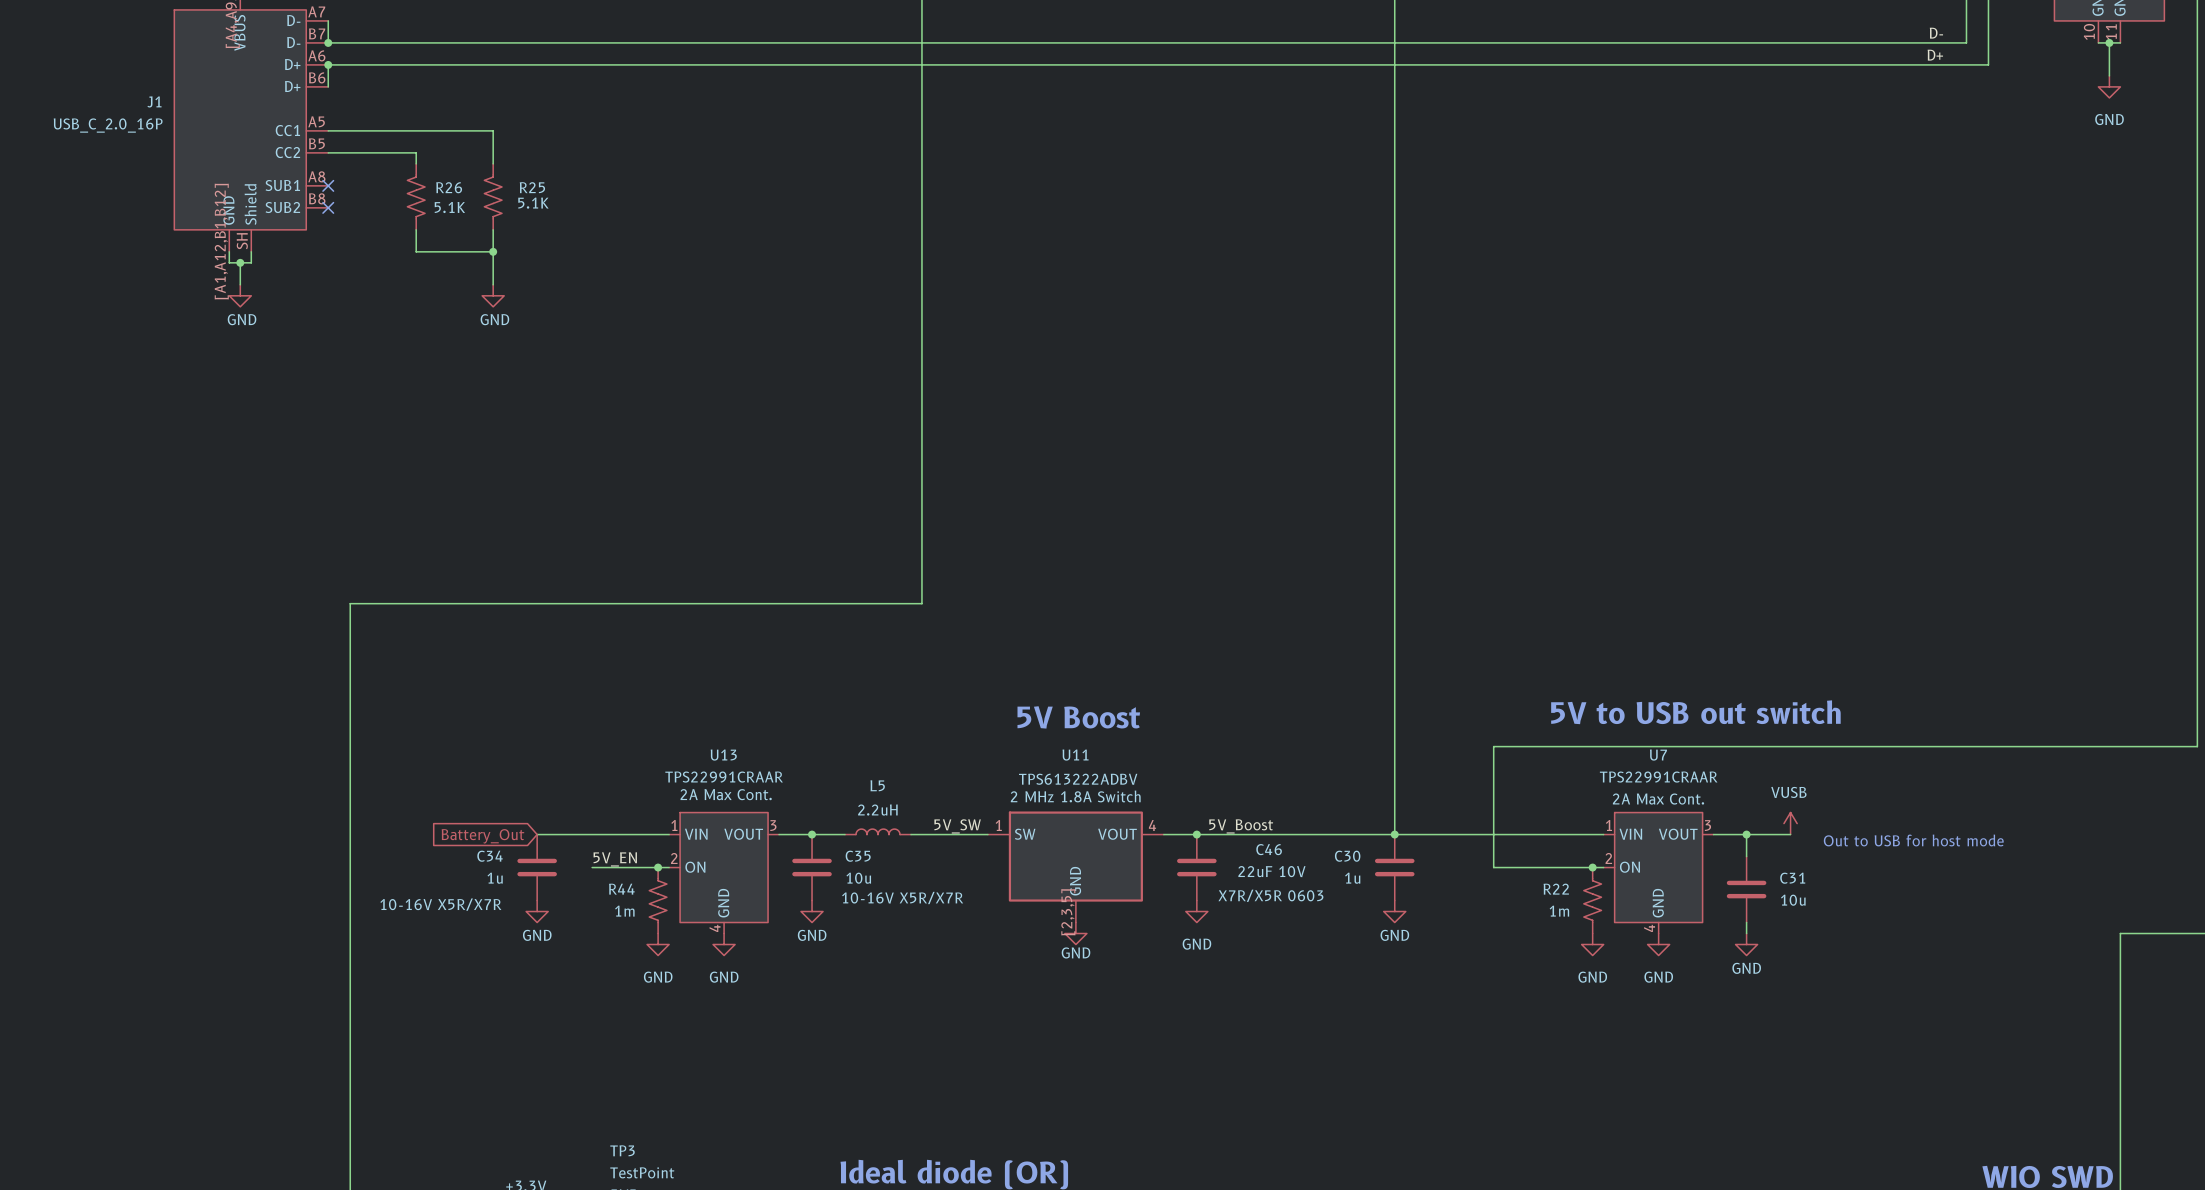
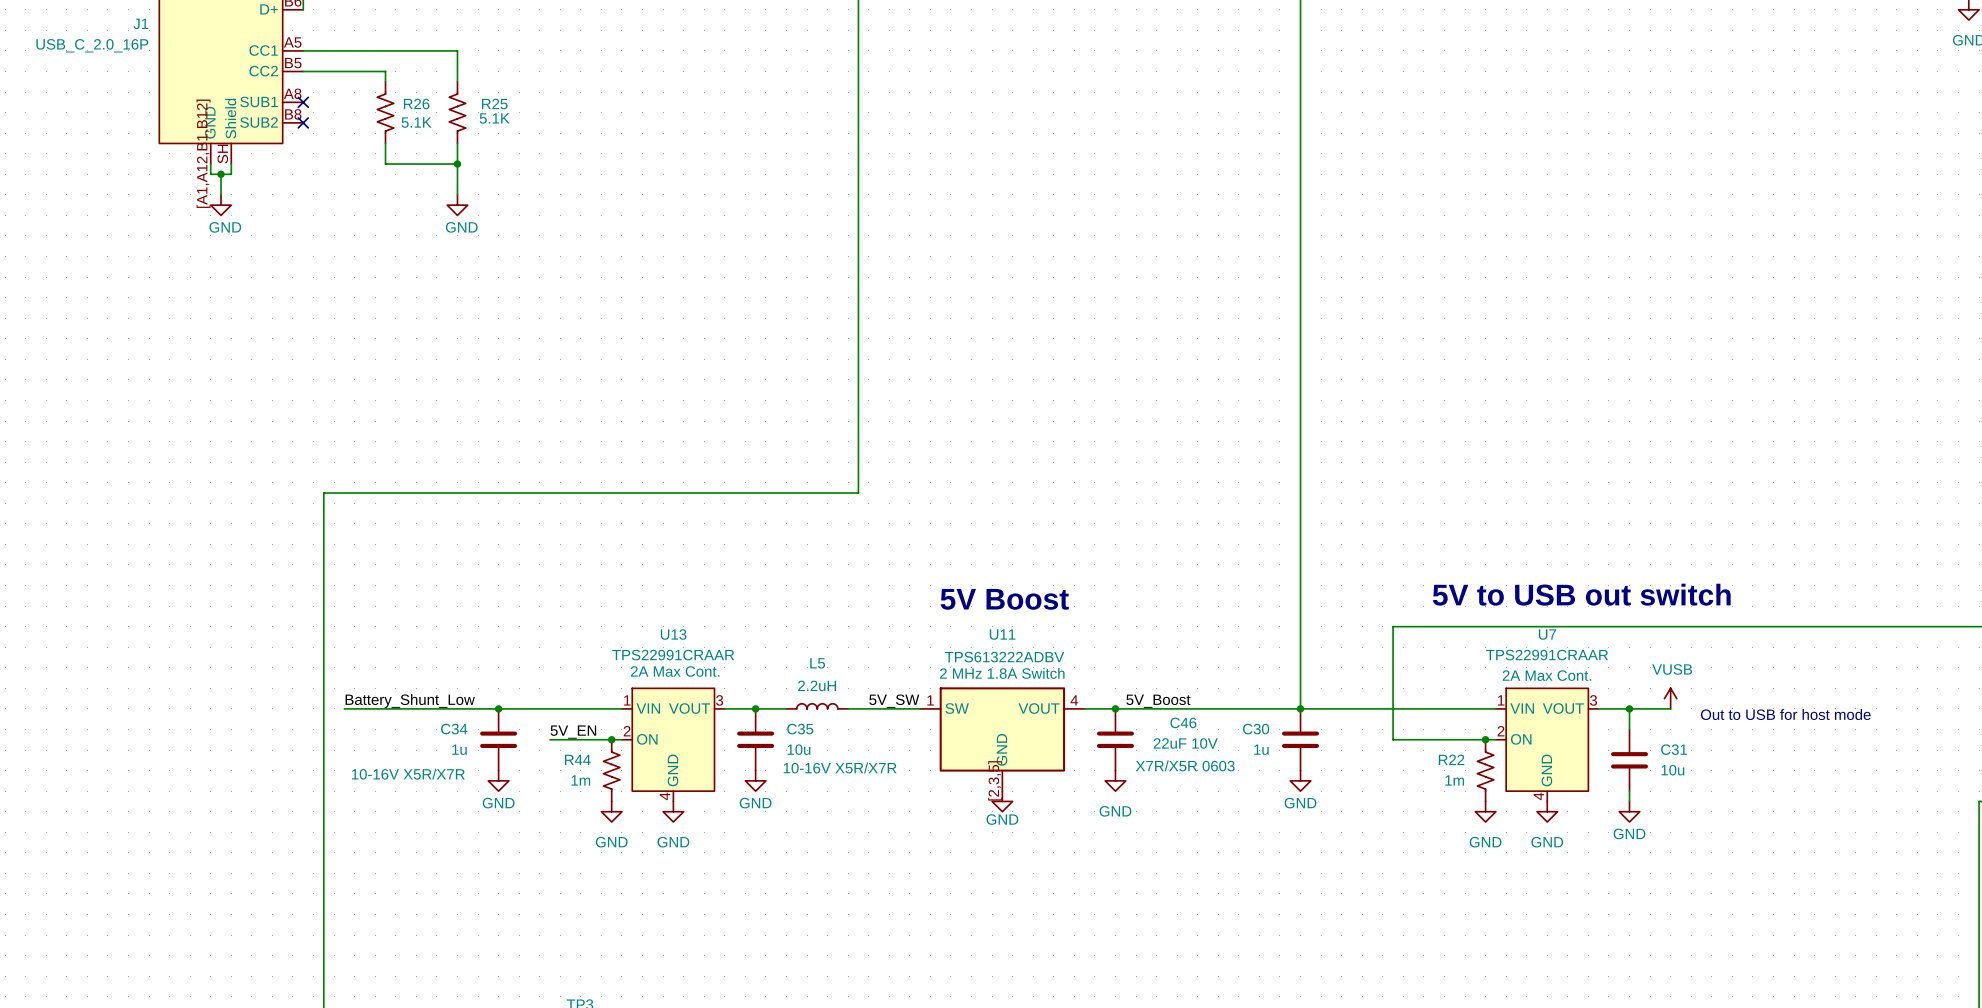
label: none -> Battery_Shunt_Low (410, 701)
wire: none -> (344, 708) (498, 708)
junction: none -> (498, 708)
global label: Battery_Out (482, 836) -> none

